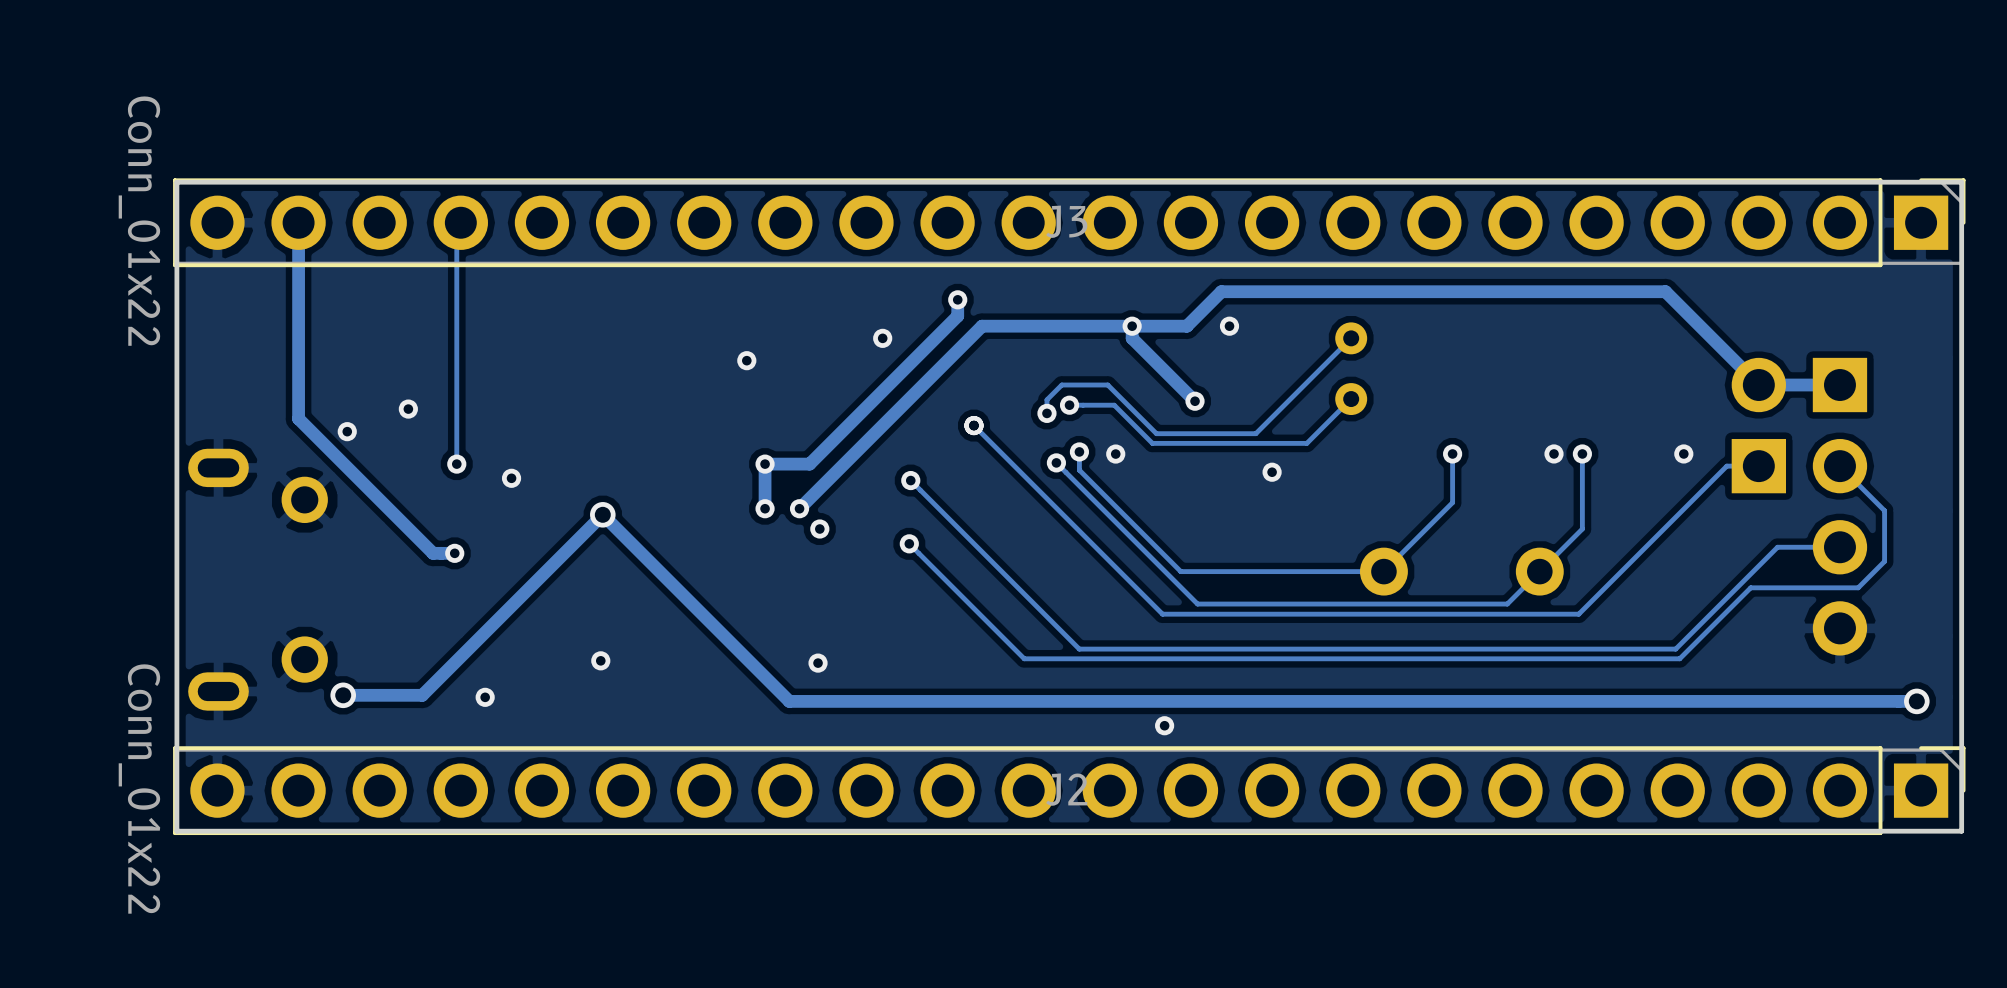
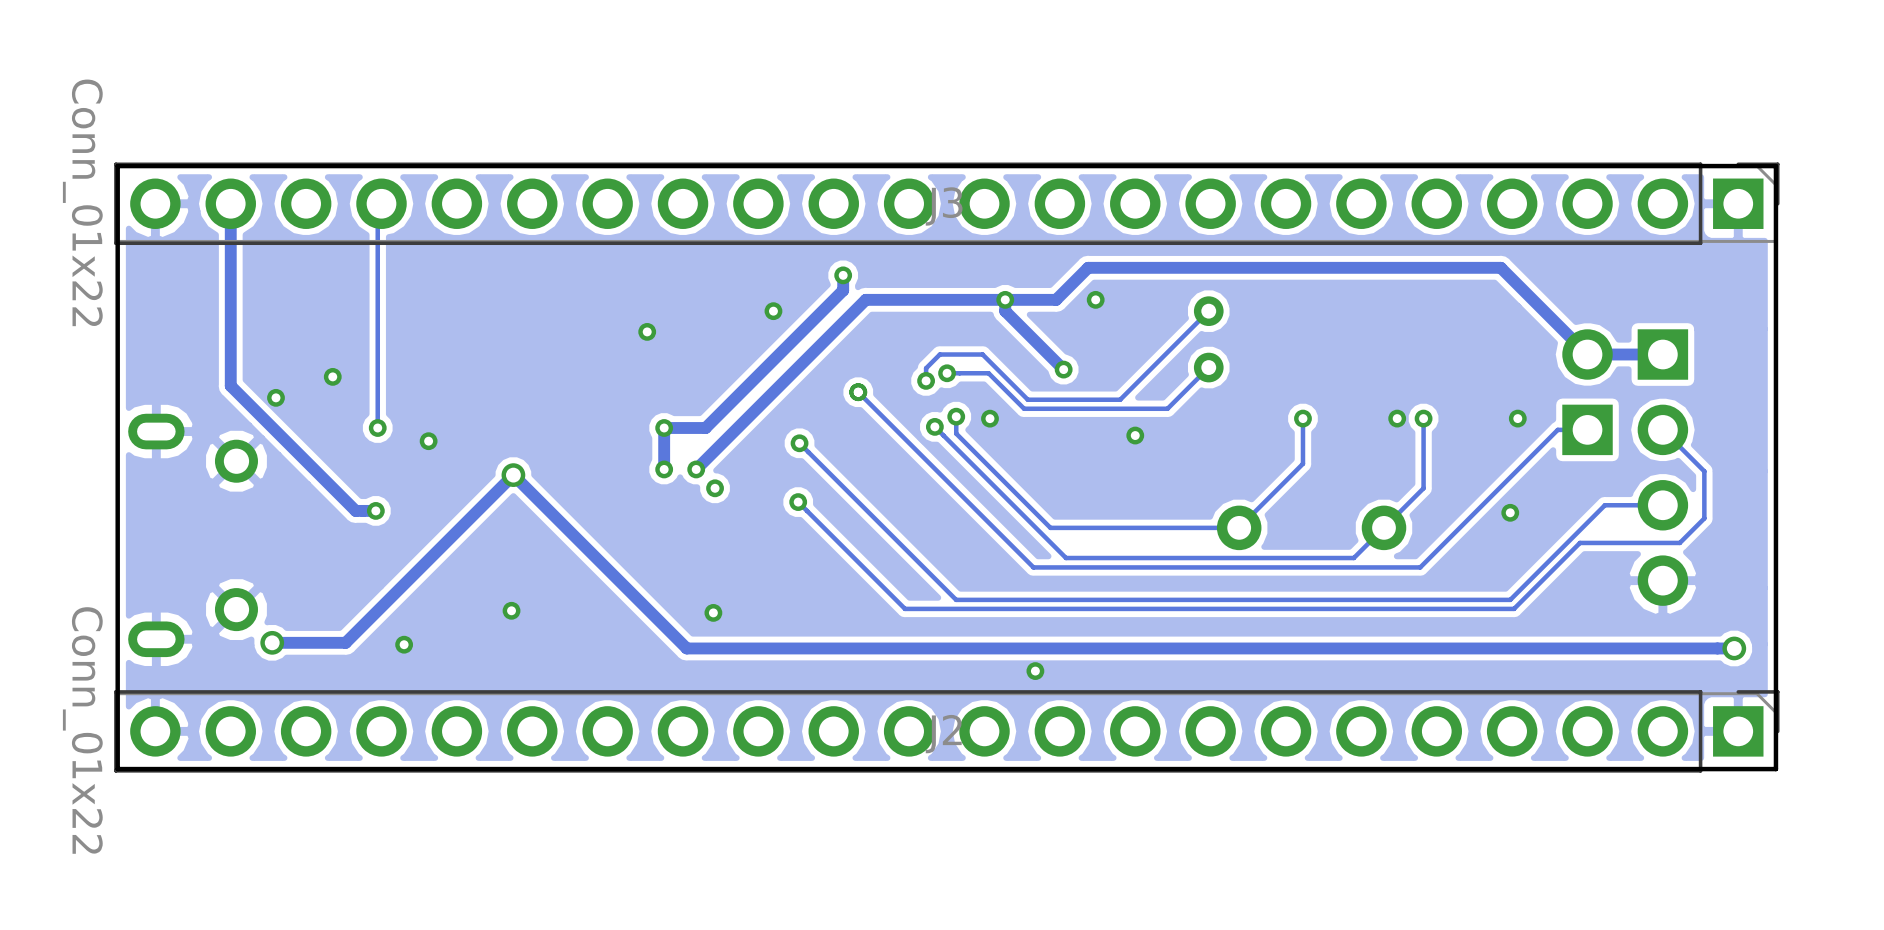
via: none -> (1510, 512)

